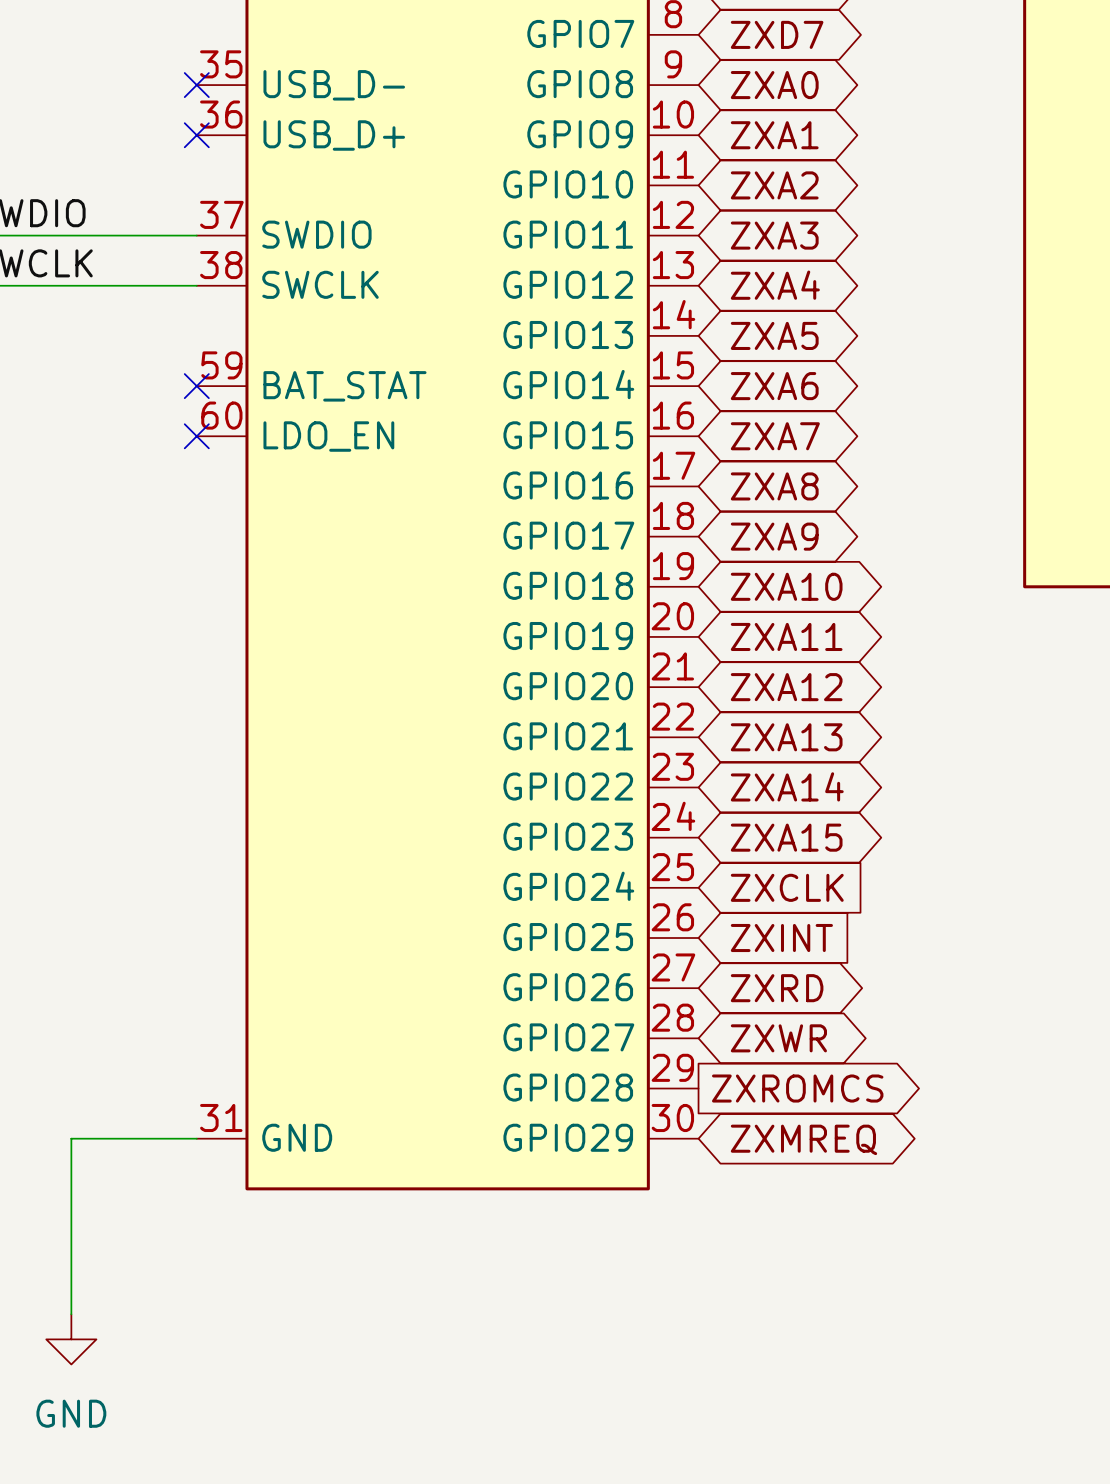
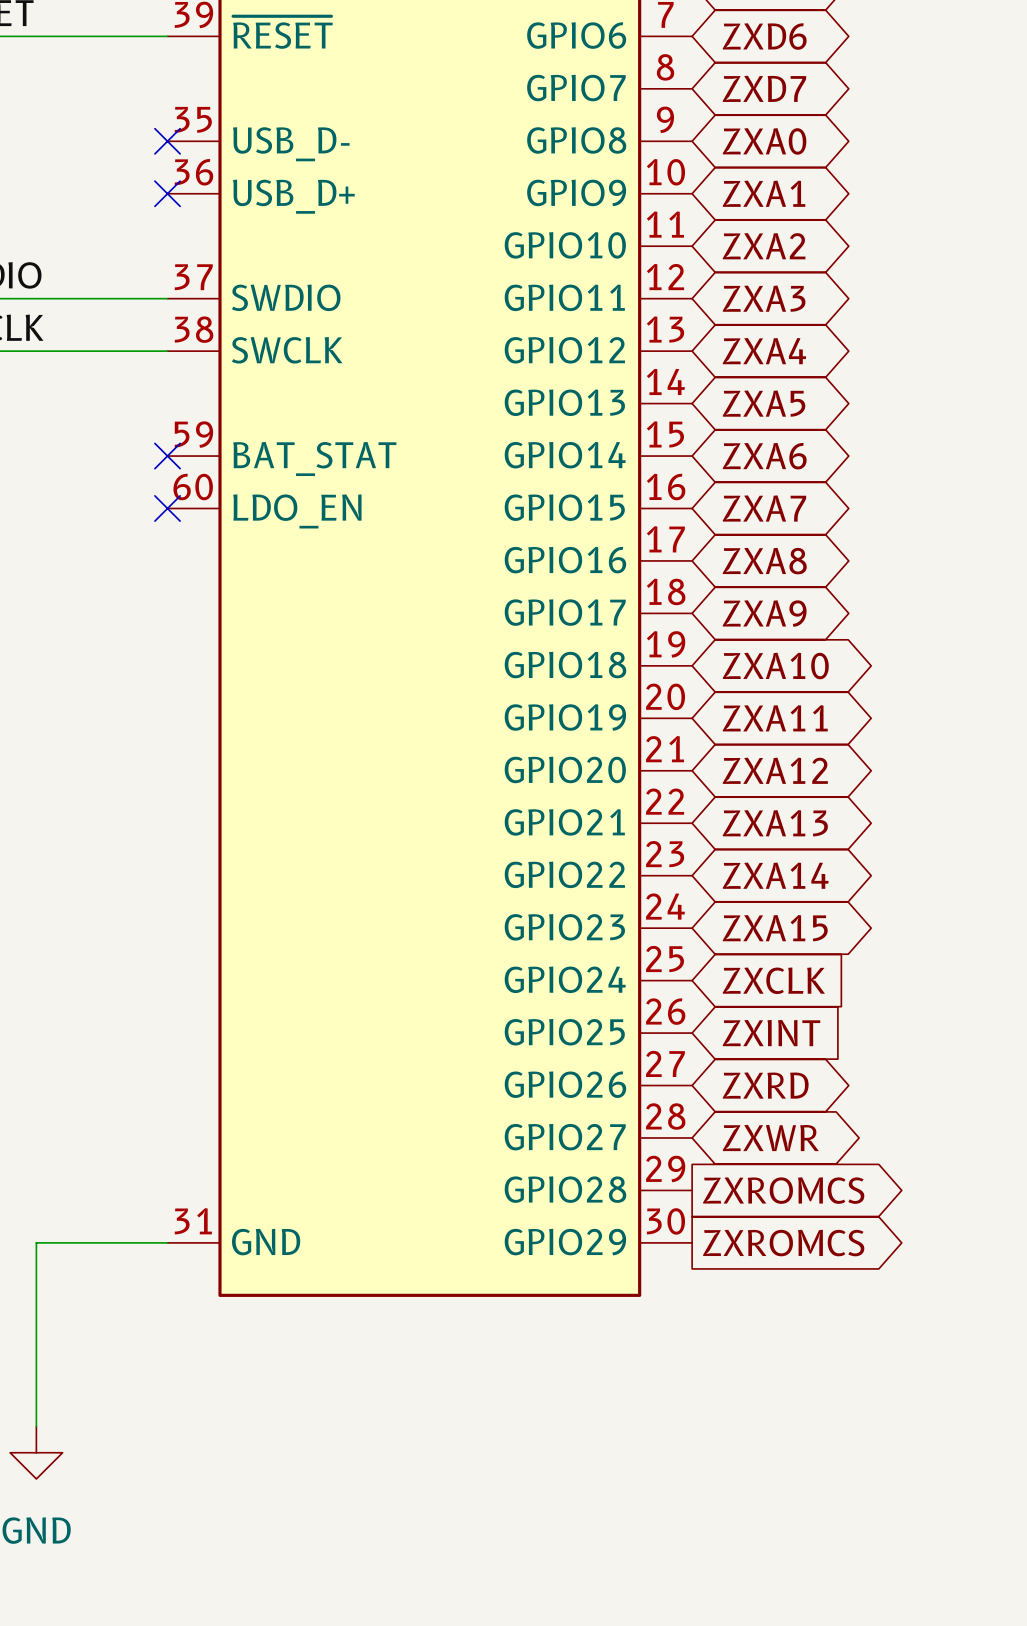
global label shape: bidirectional (803, 1139) -> output (783, 1243)
global label: ZXMREQ (803, 1139) -> ZXROMCS (783, 1243)

